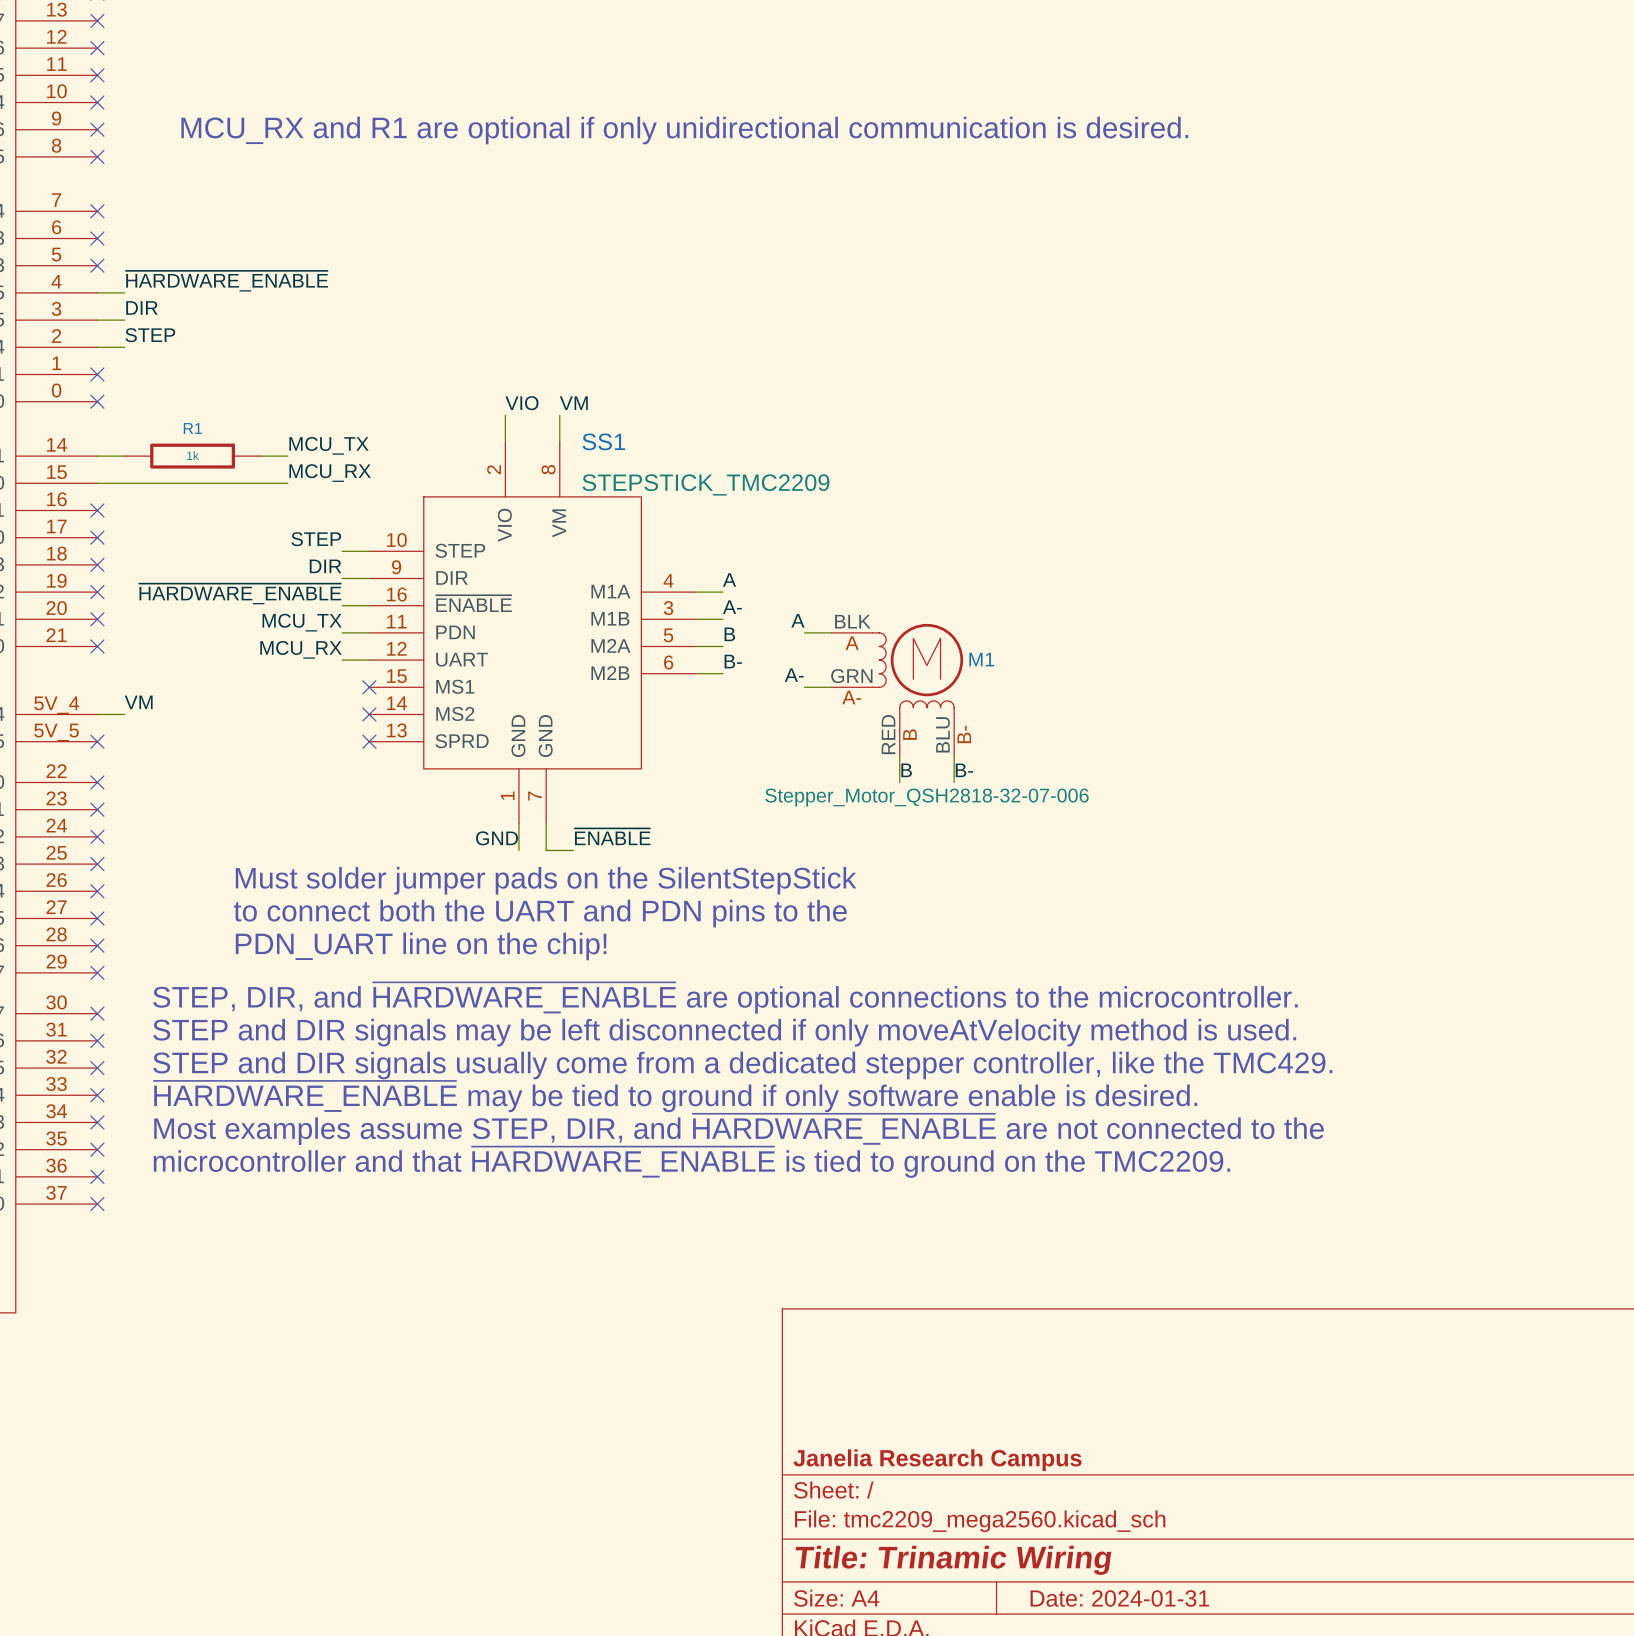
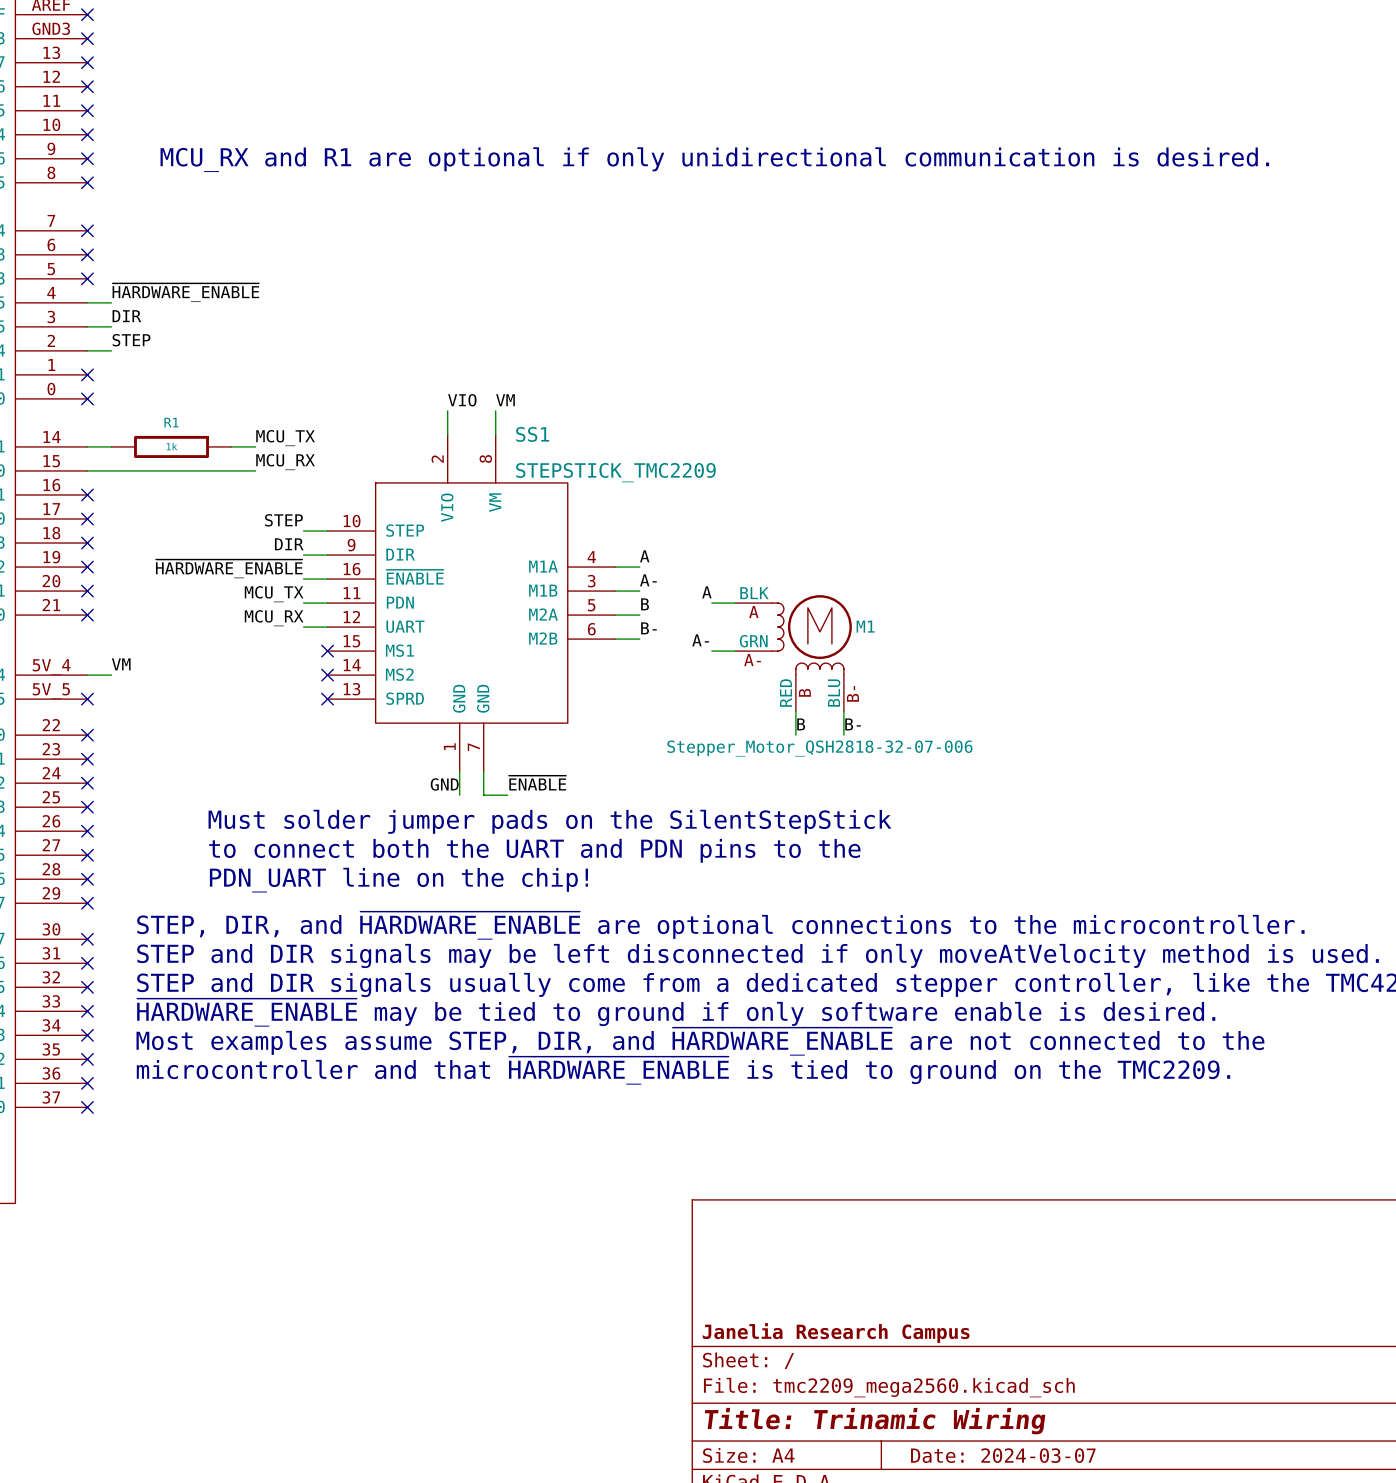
title block: Date: 2024-01-31 (1119, 1598) -> Date: 2024-03-07 (1003, 1455)

